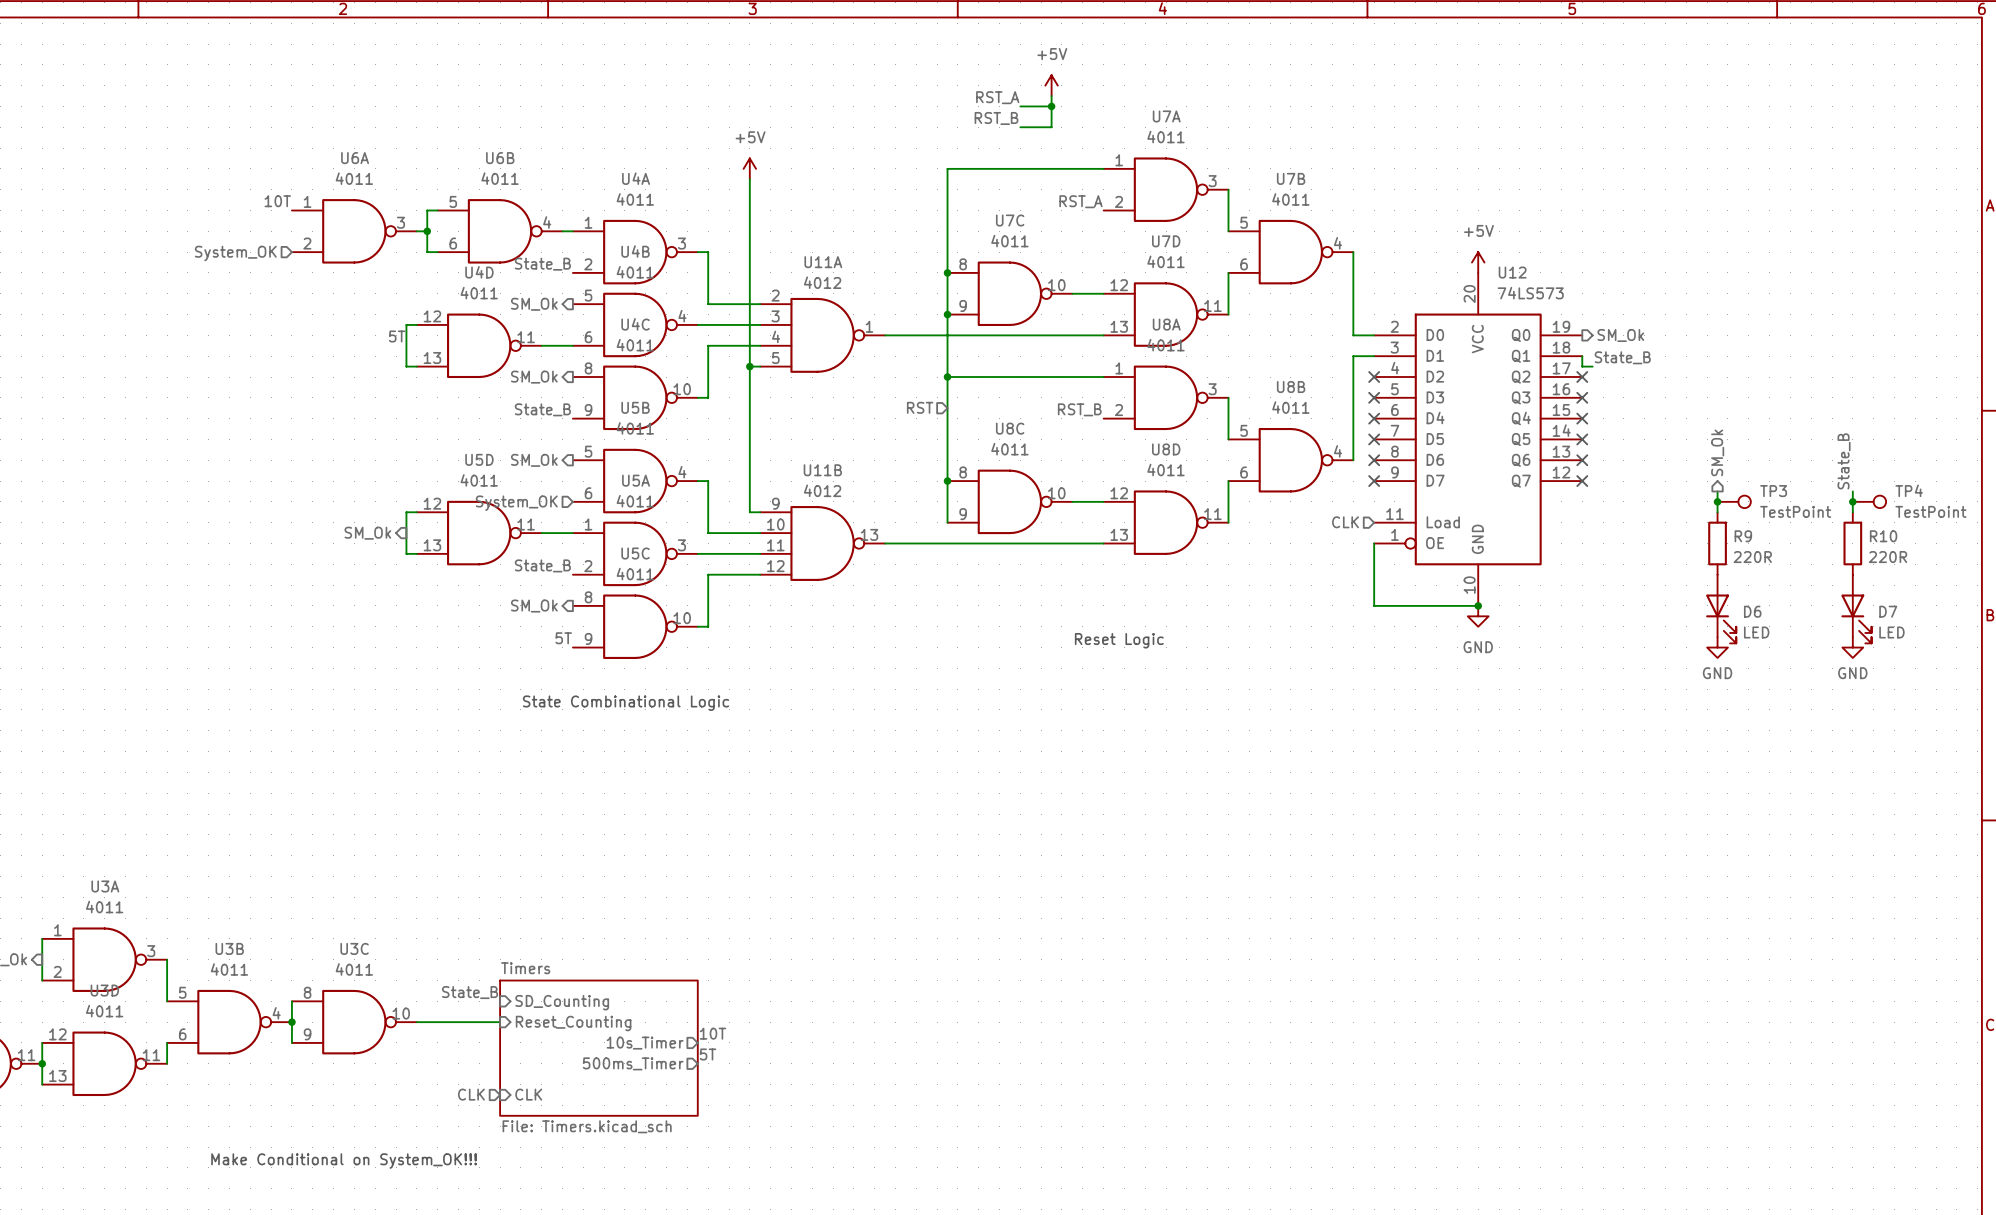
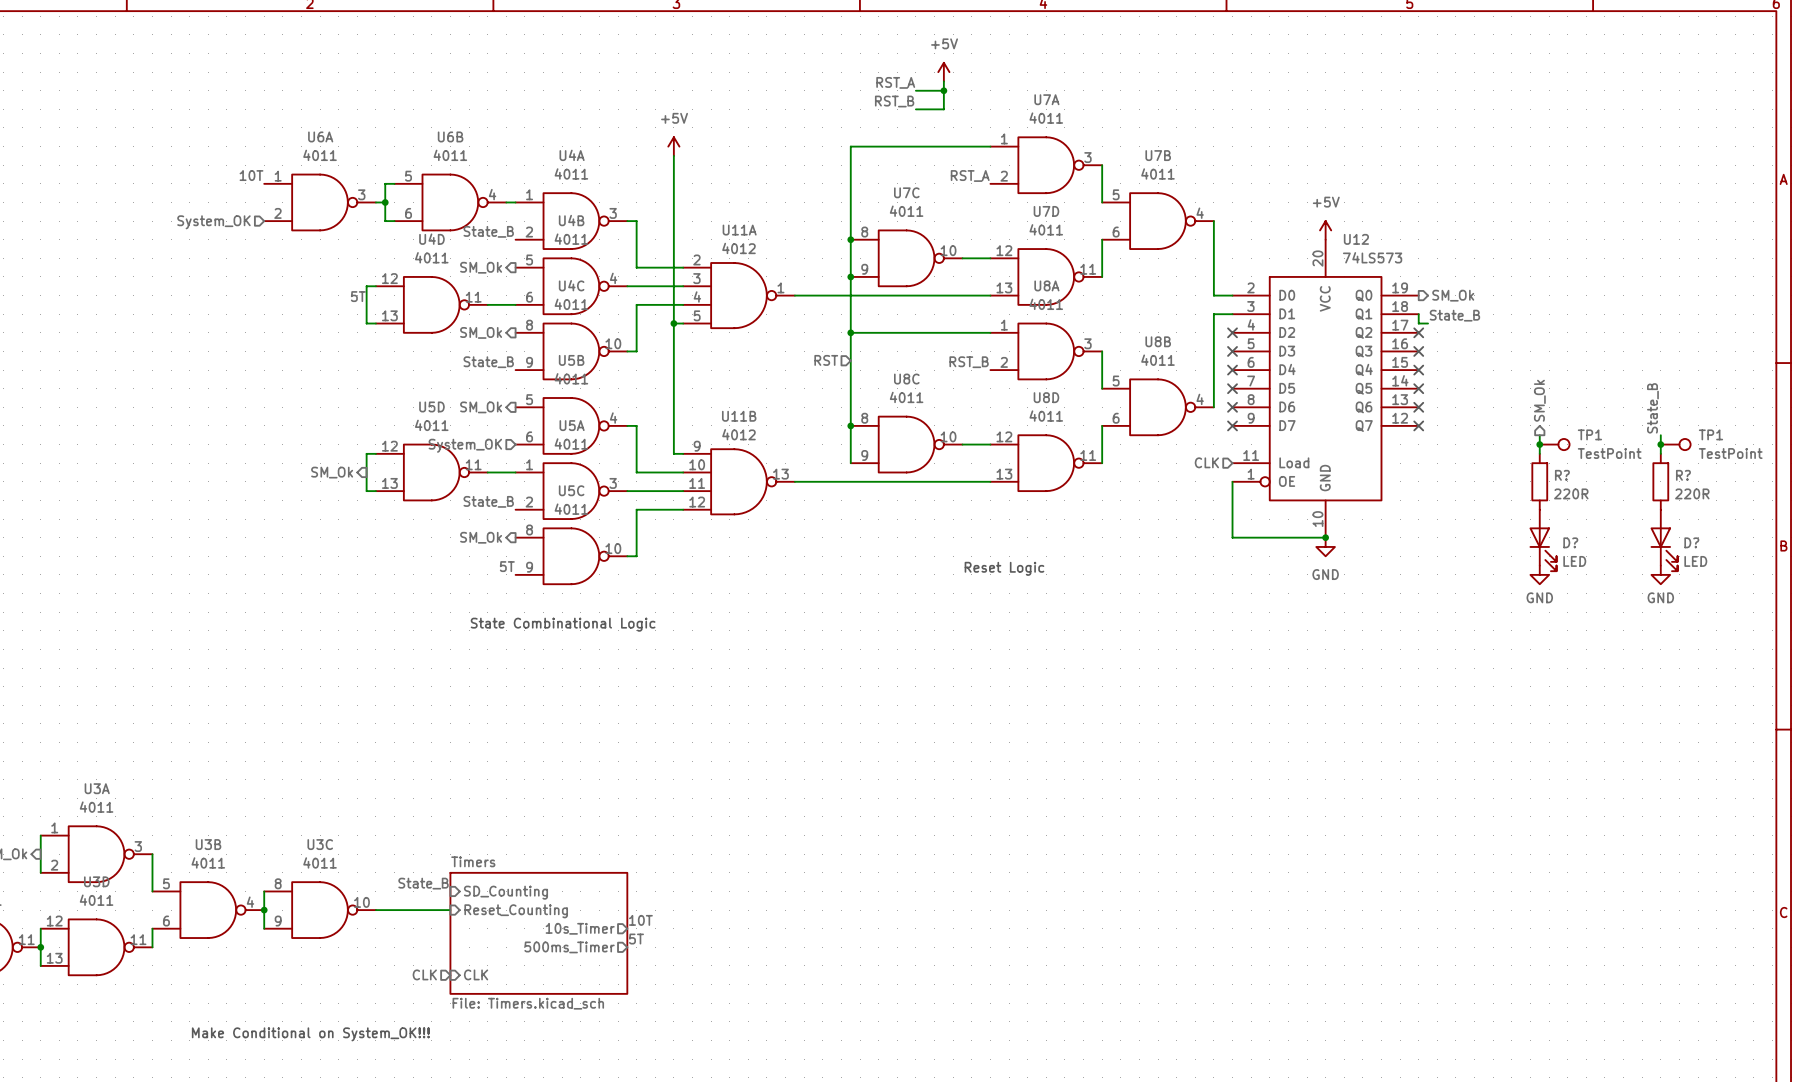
TP4 name: TP4 (1909, 490) -> TP1 (1710, 434)
TP3 name: TP3 (1773, 491) -> TP1 (1589, 434)
R9 name: R9 (1743, 536) -> R? (1562, 475)
R10 name: R10 (1883, 536) -> R? (1683, 475)
D6 name: D6 (1752, 611) -> D? (1570, 542)
D7 name: D7 (1888, 611) -> D? (1691, 542)

